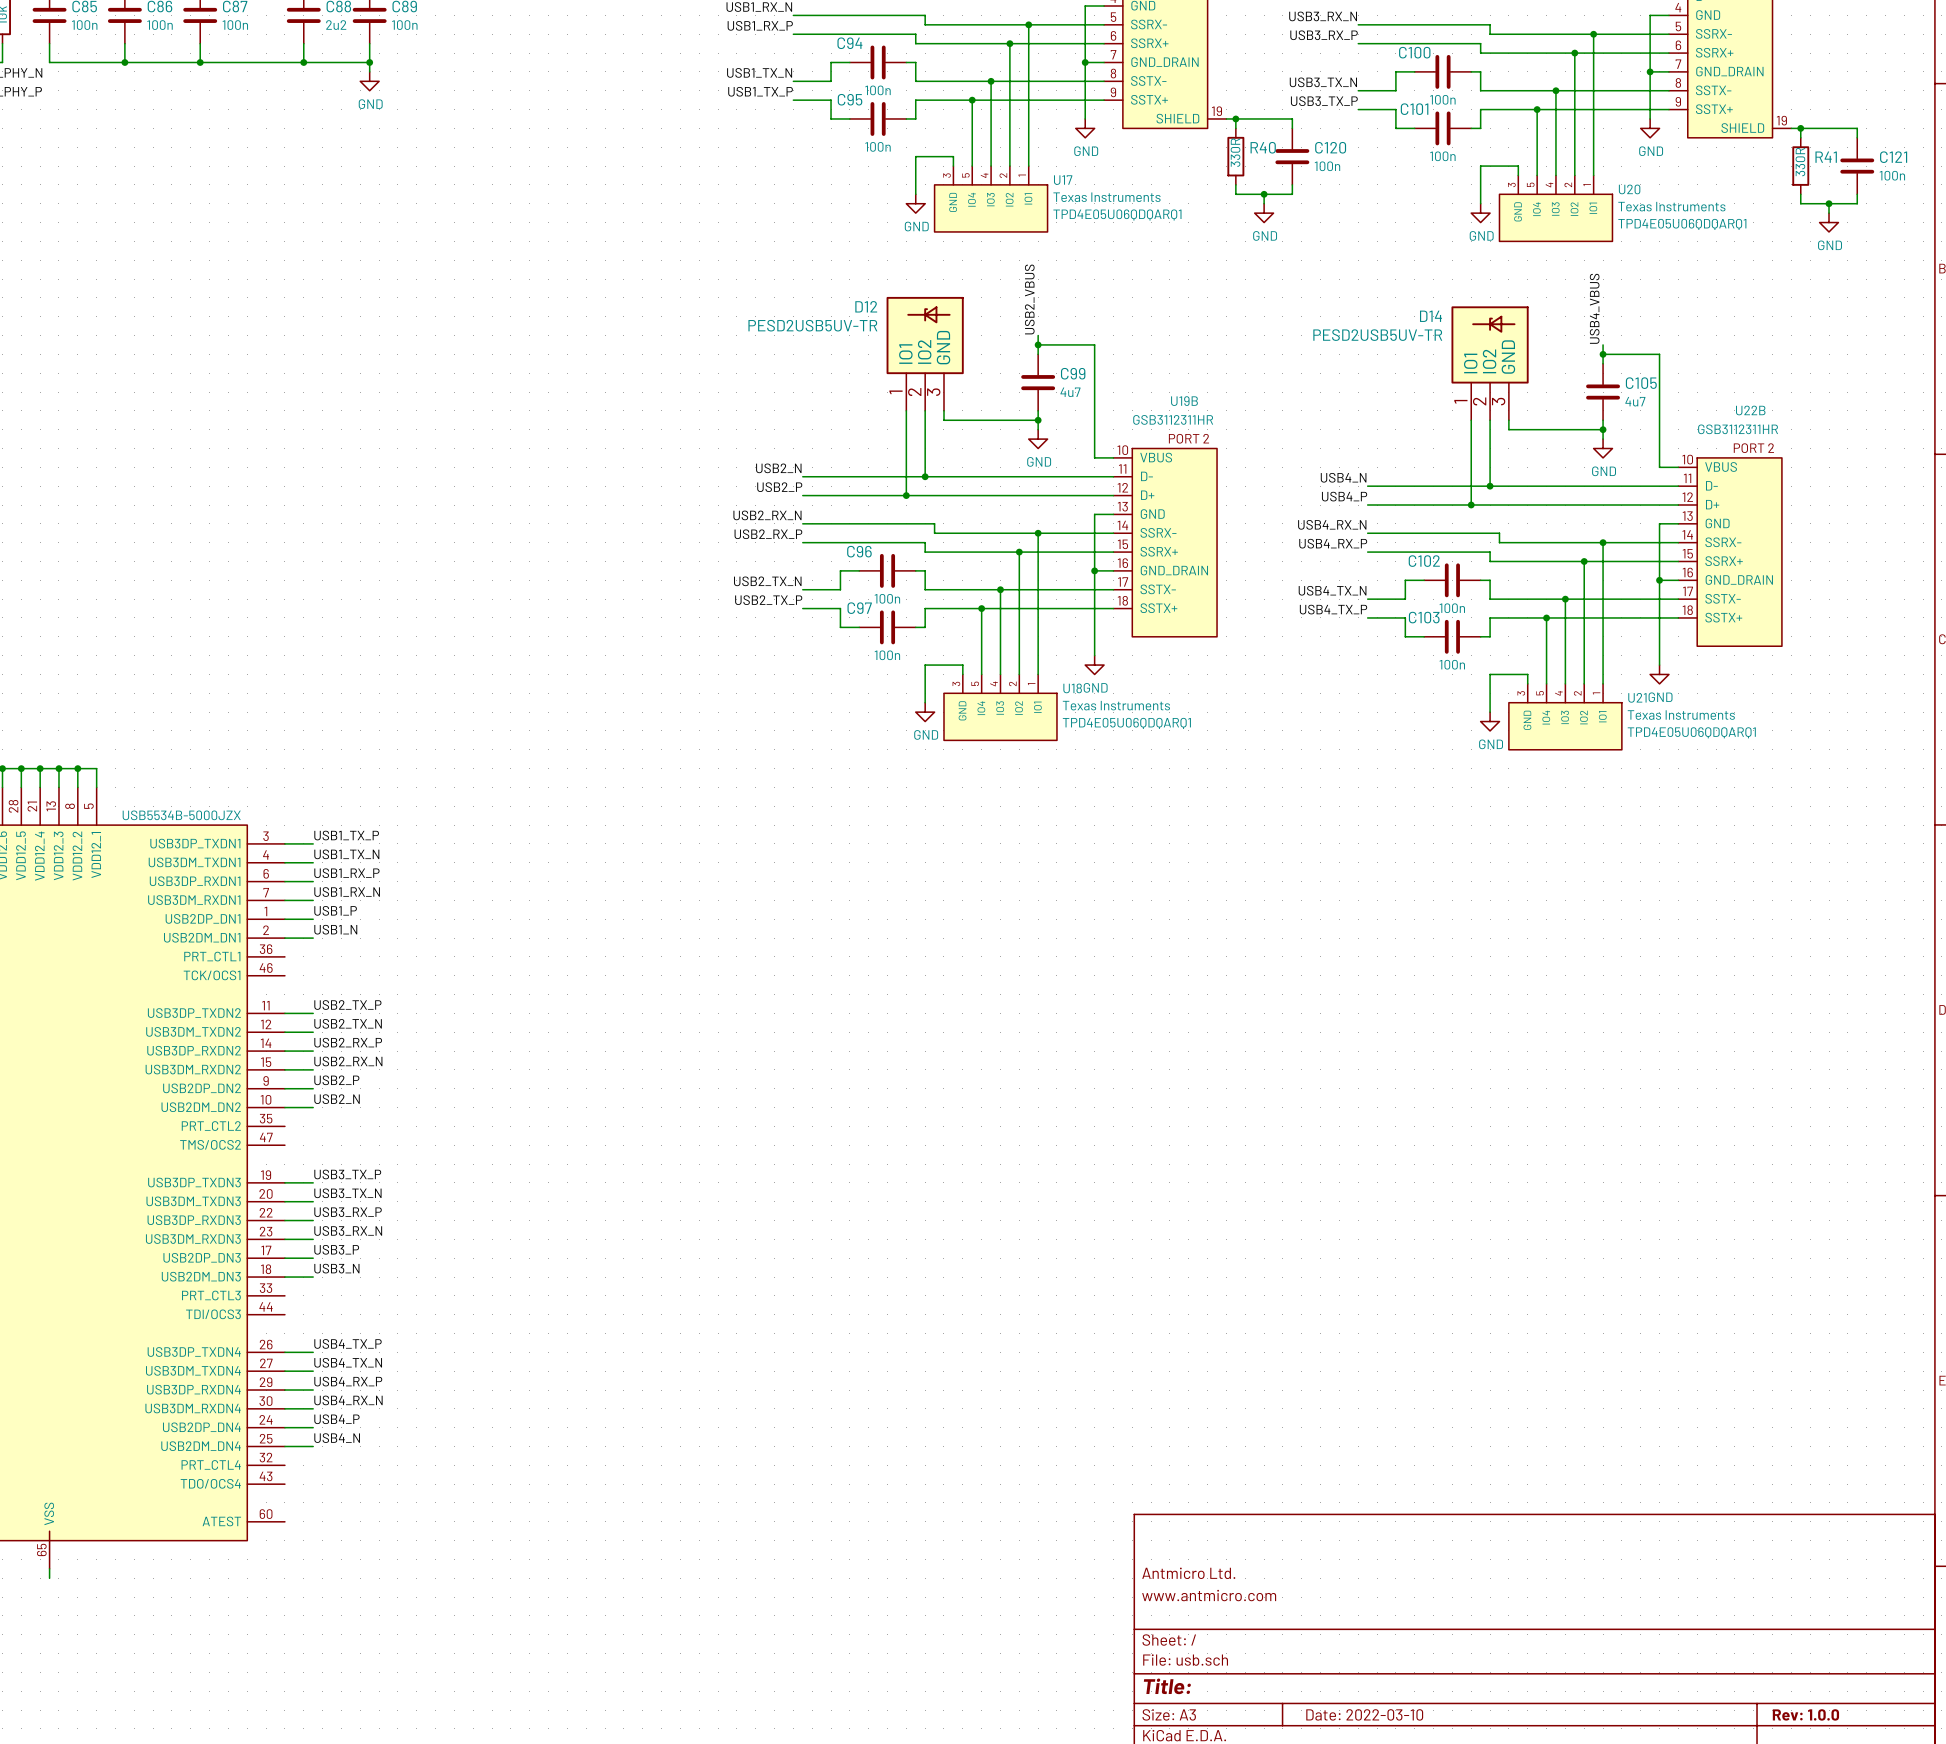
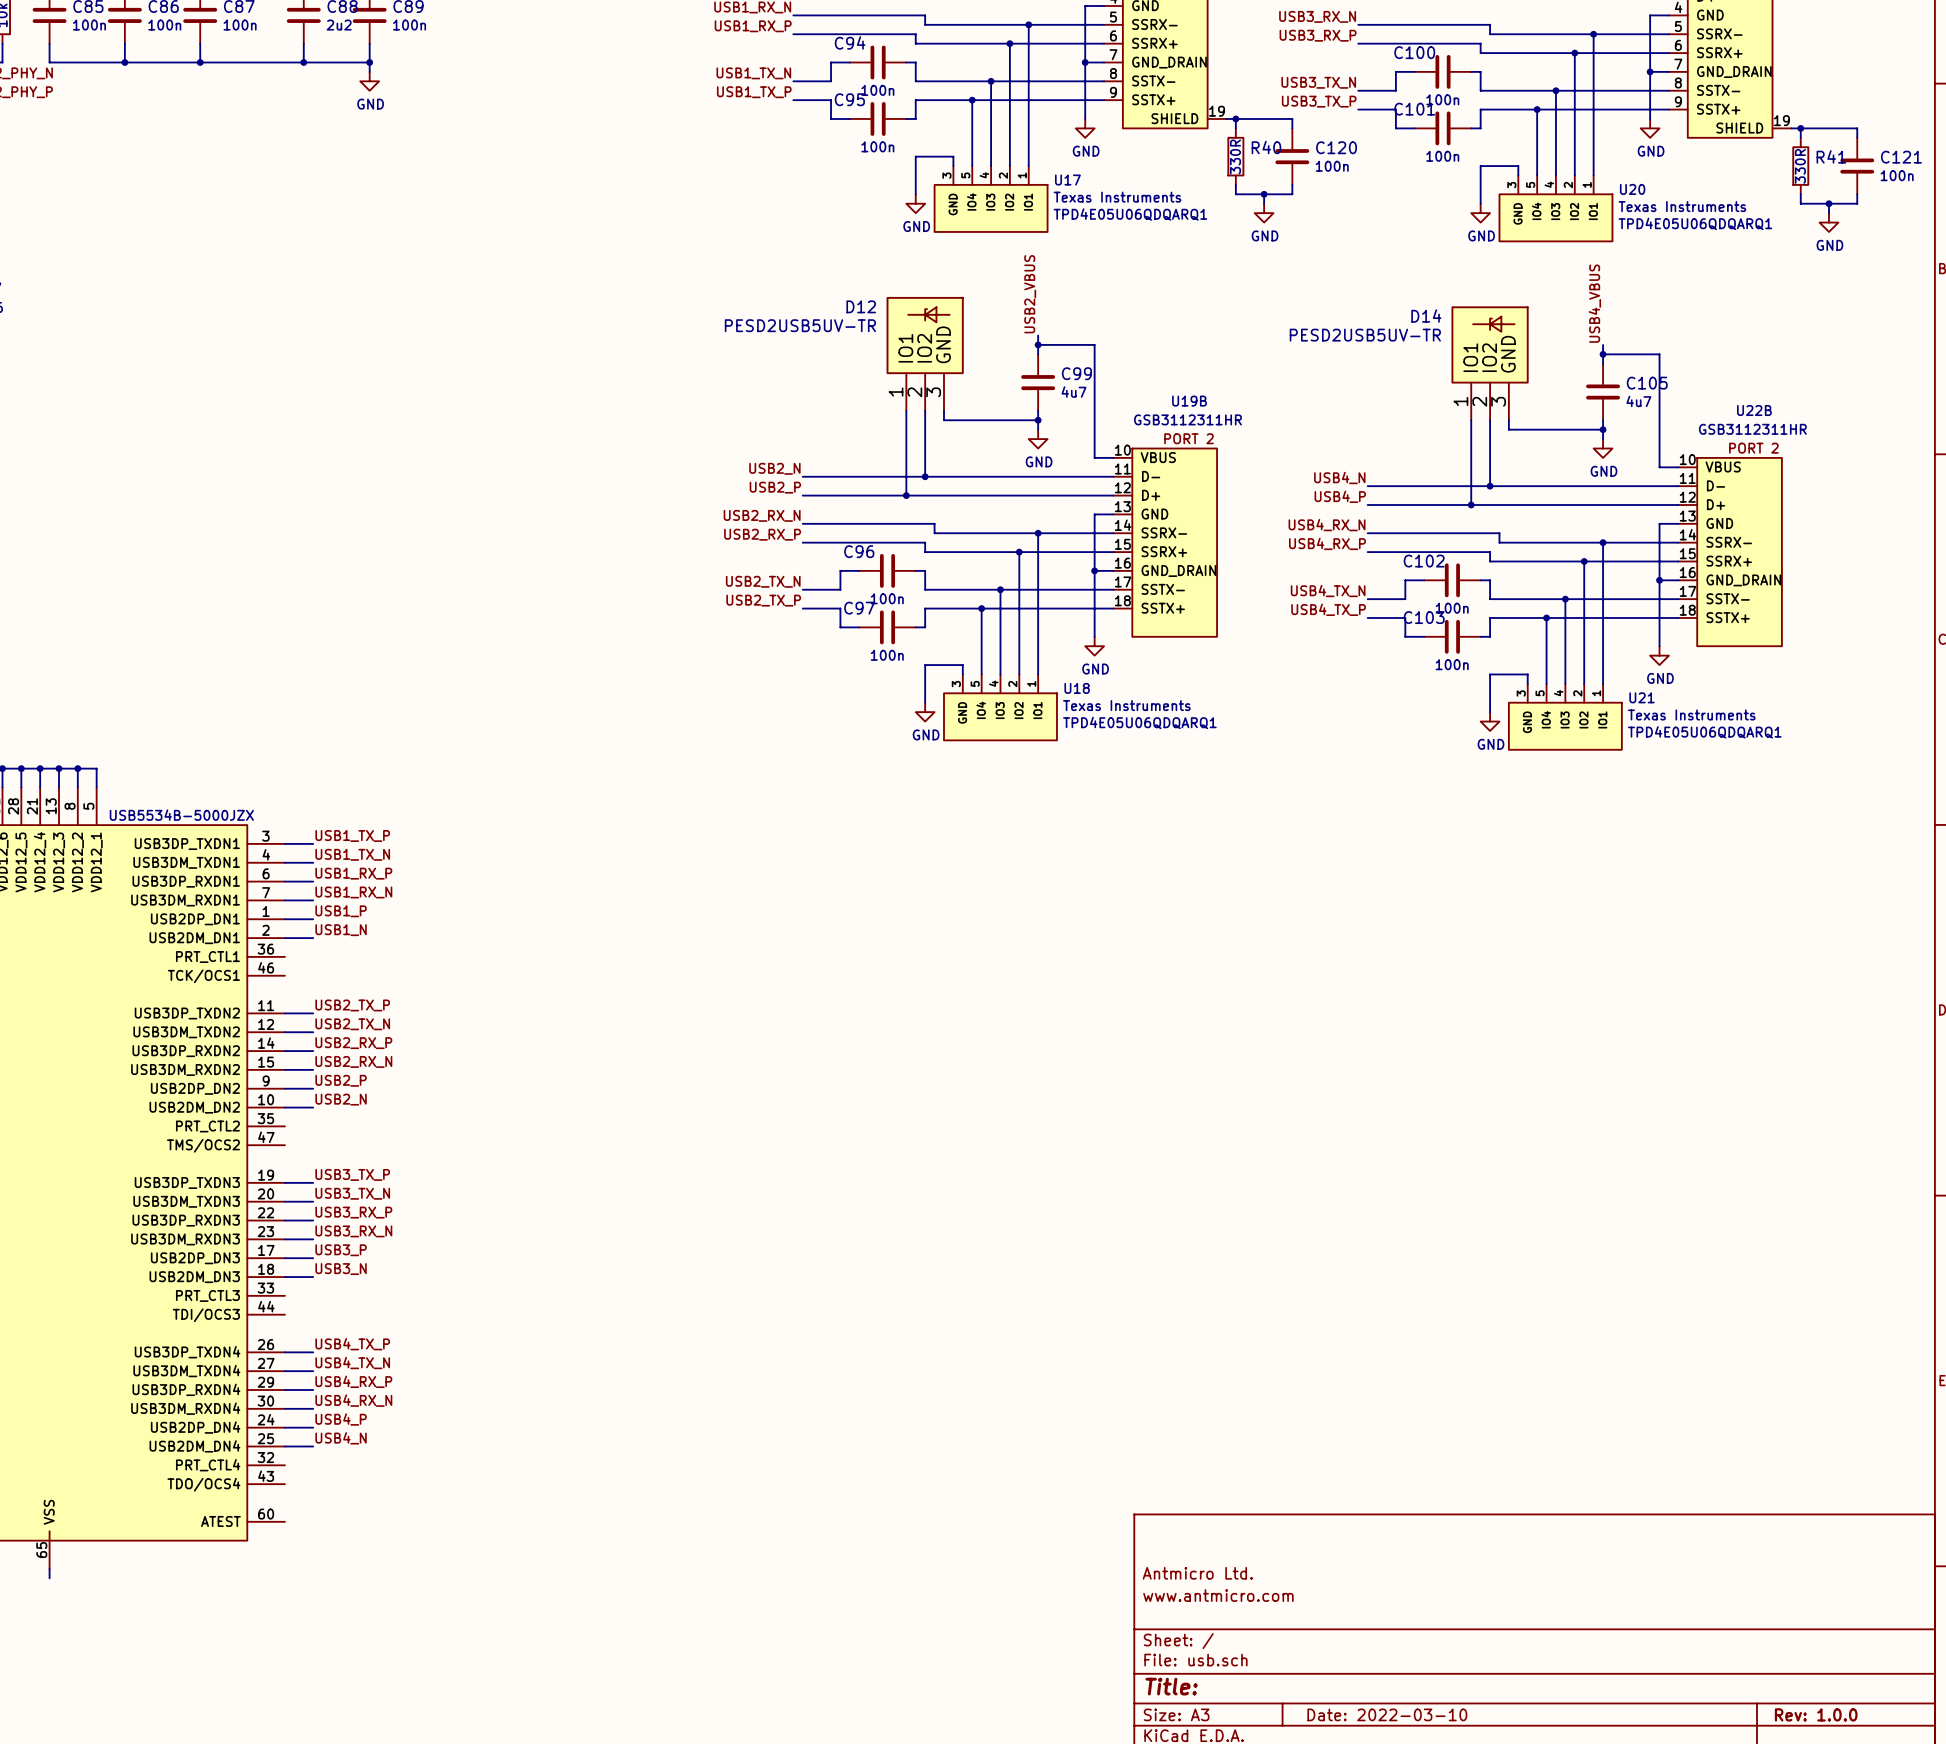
power symbol position: GND (1094, 665) -> GND (1094, 646)
power symbol position: GND (1659, 674) -> GND (1659, 655)

